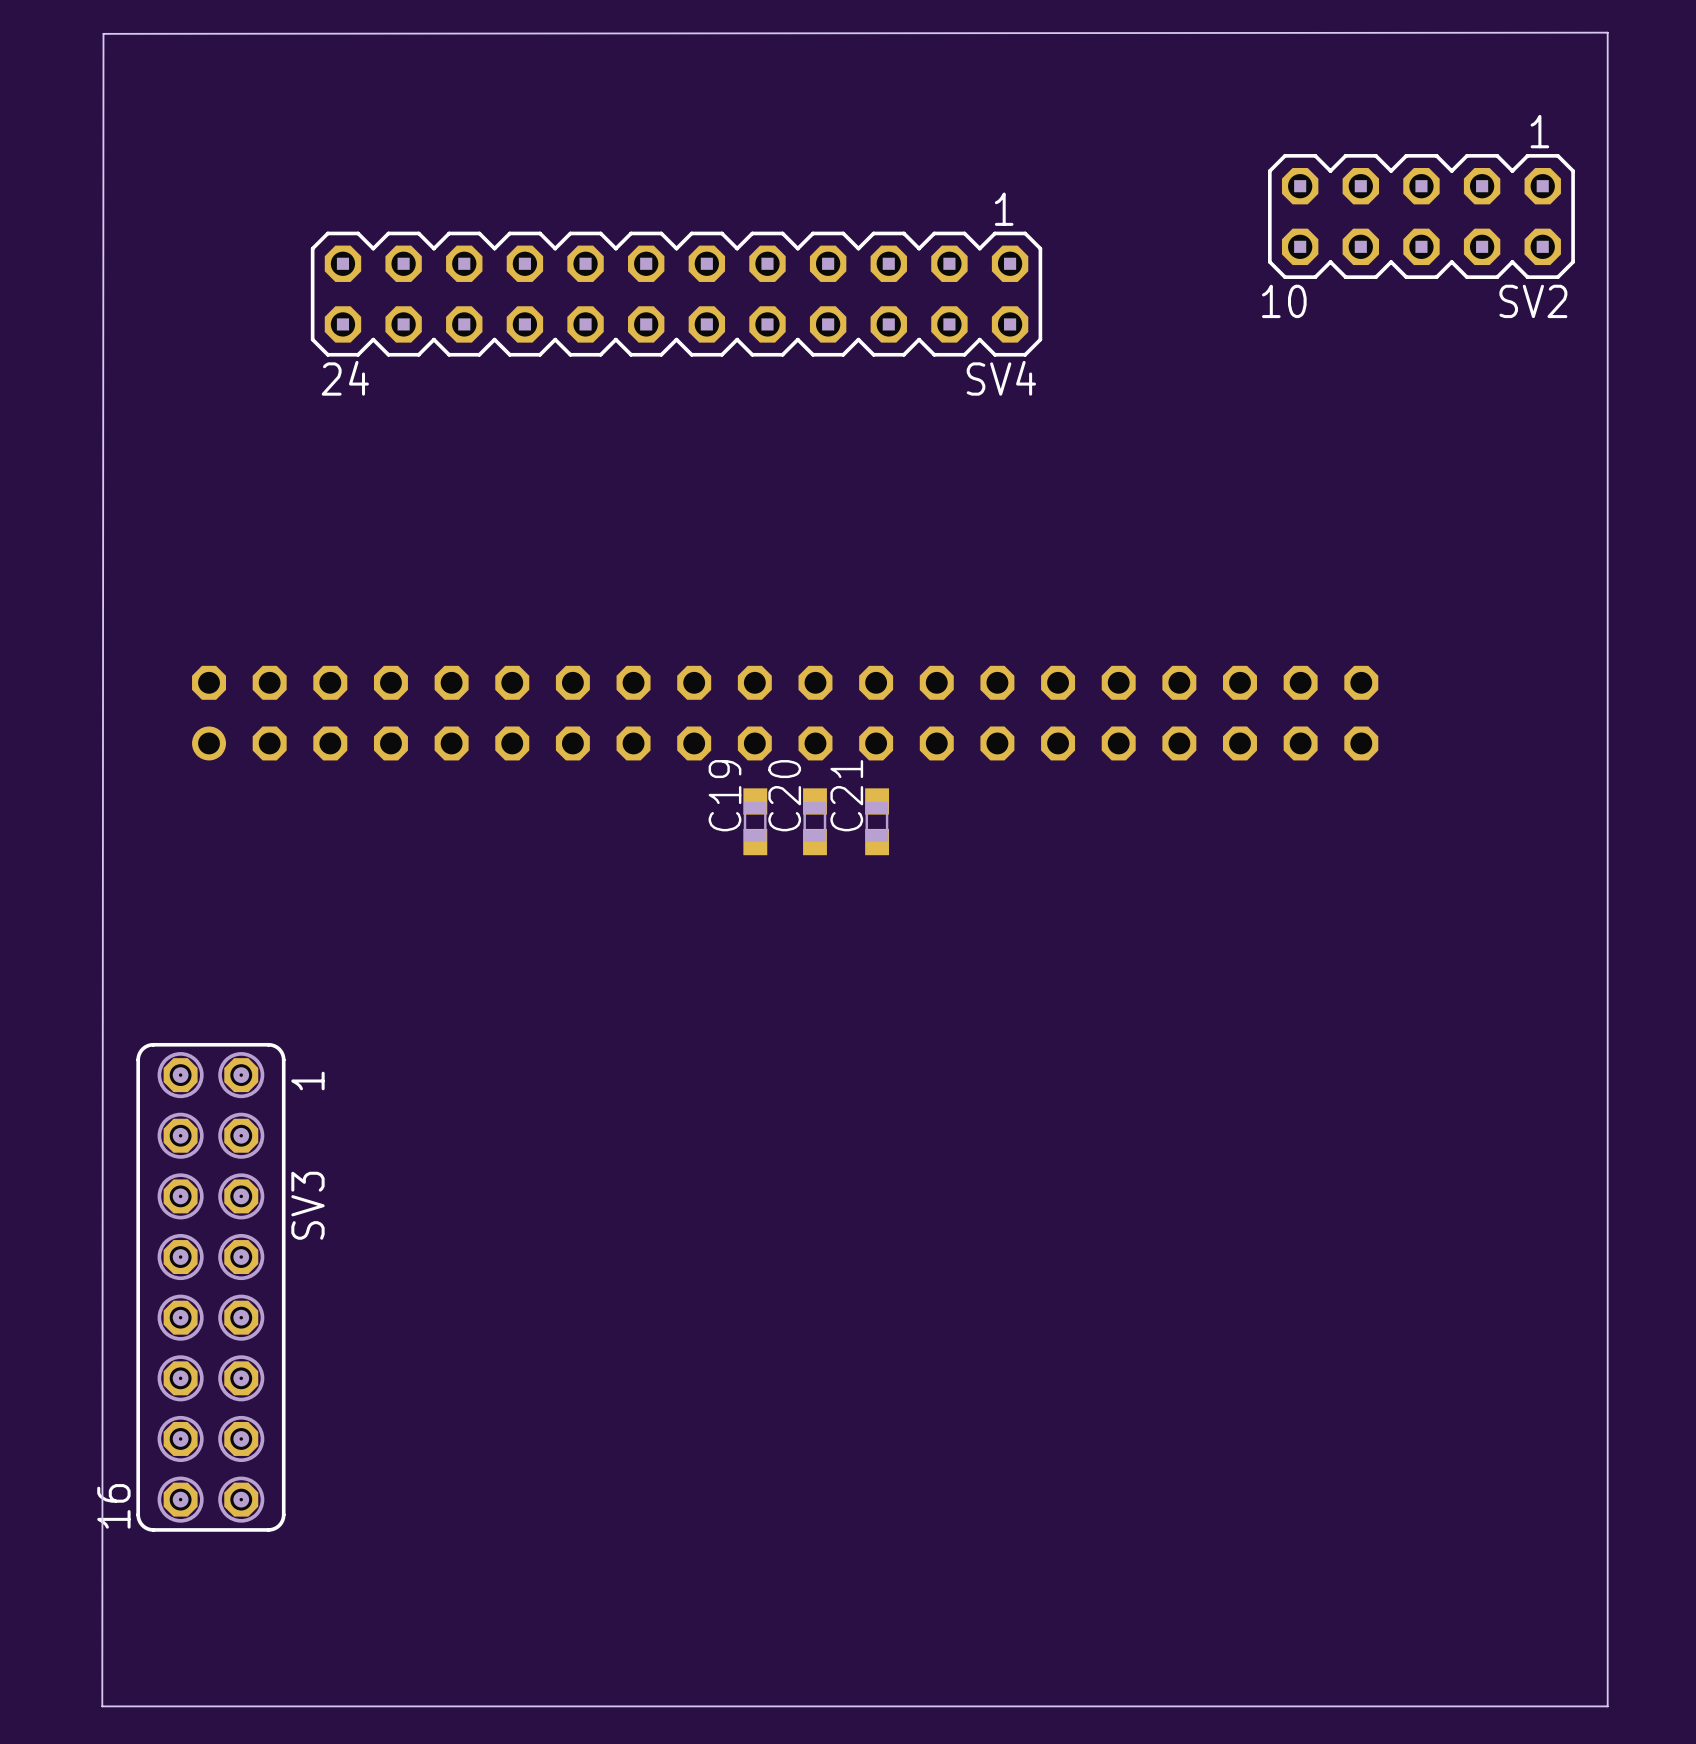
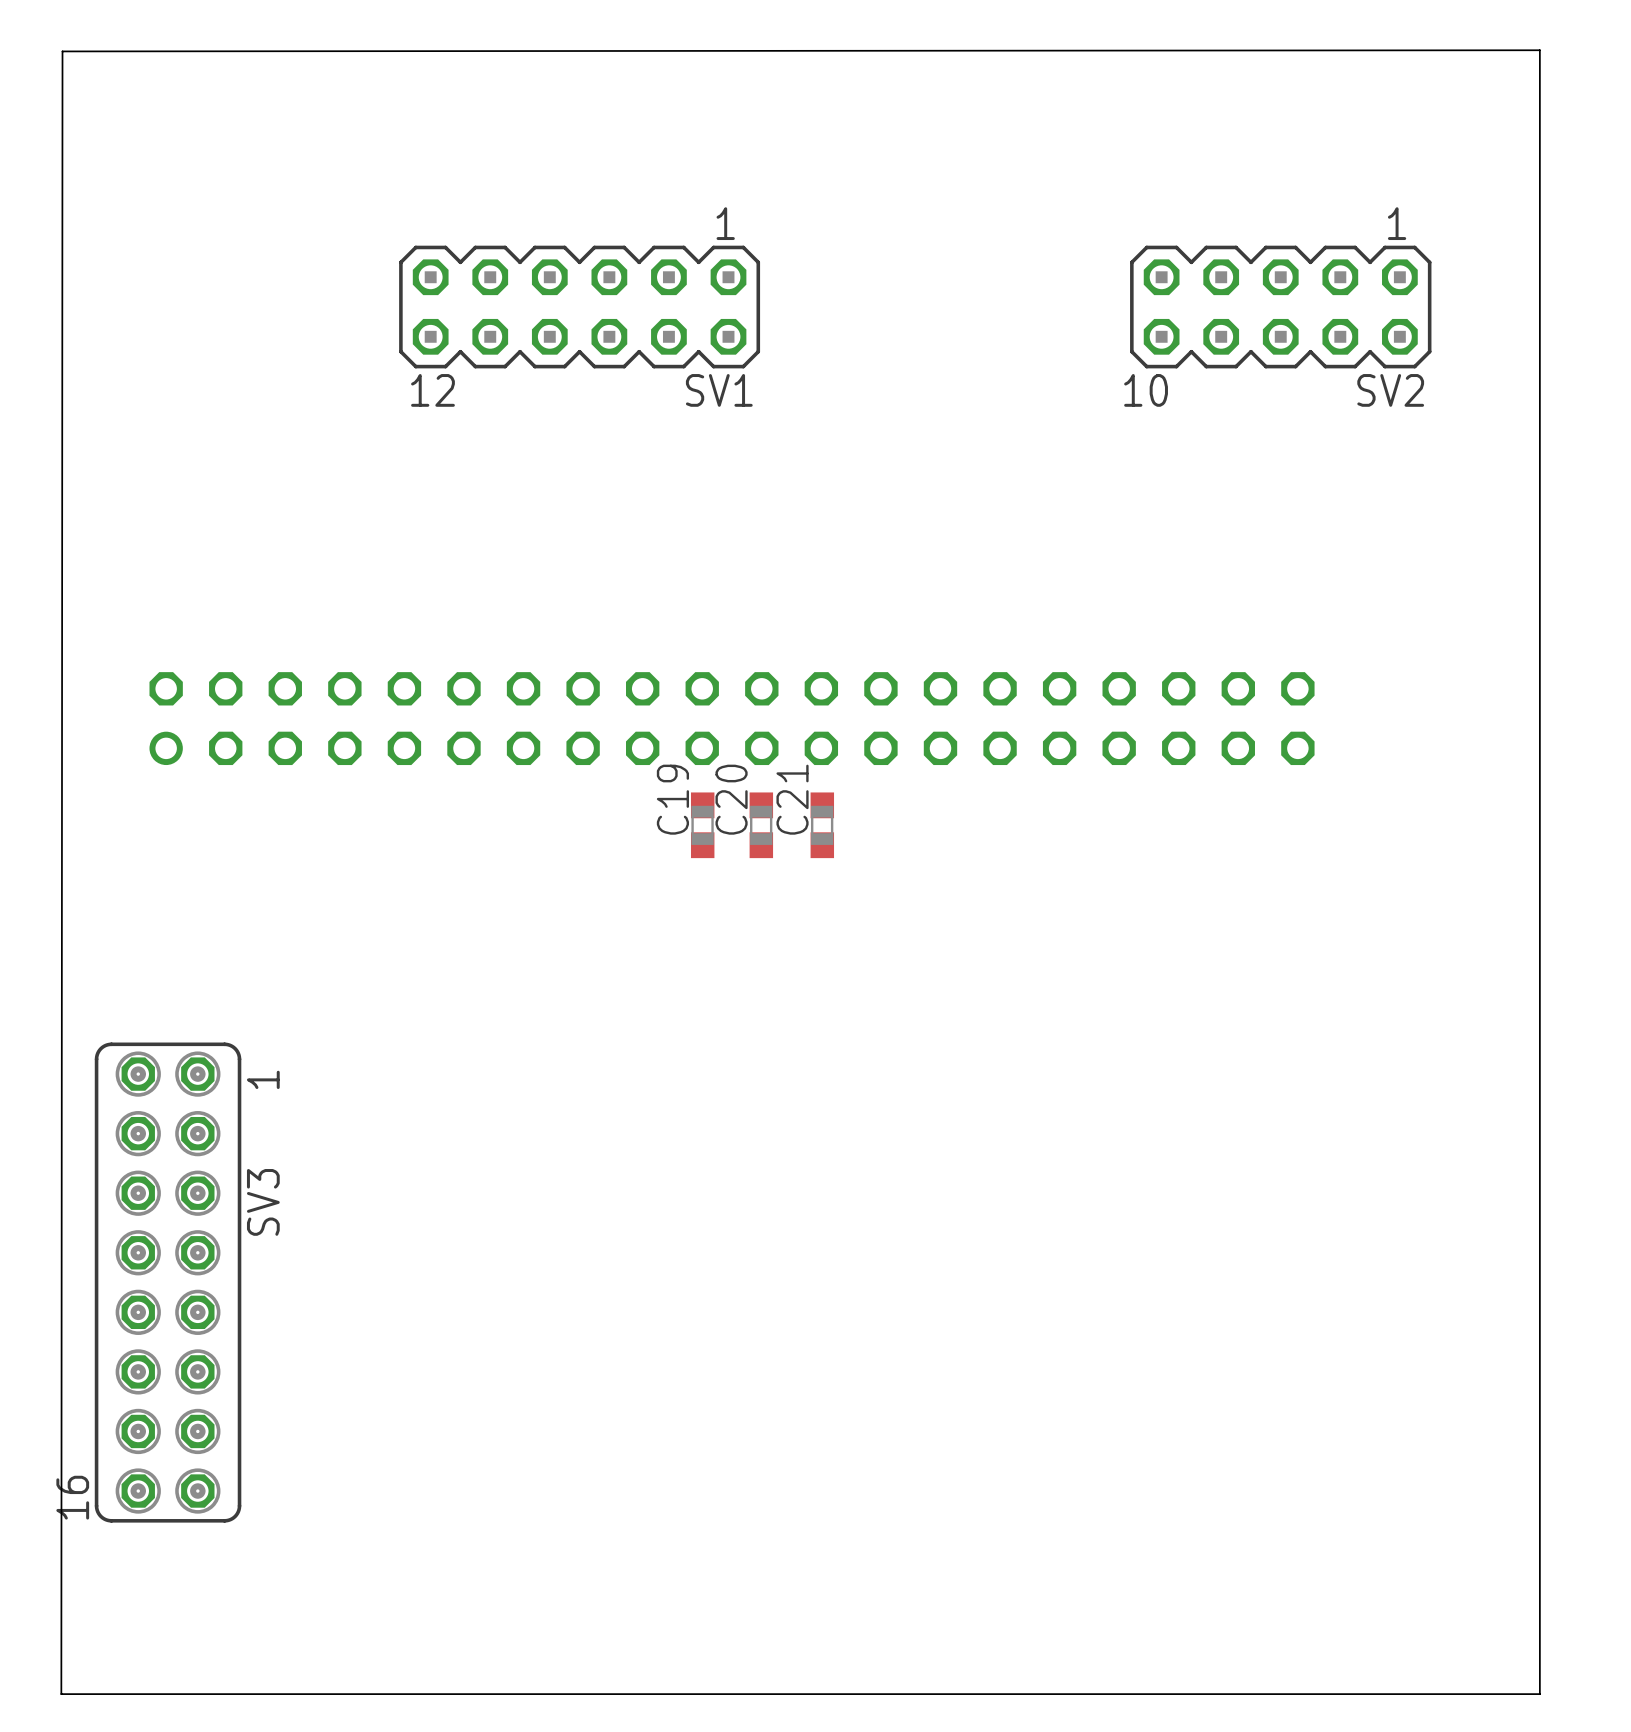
SV2 position: (1421, 216) -> (1280, 307)
SV1: none -> (579, 307)
SV4: (676, 294) -> none

